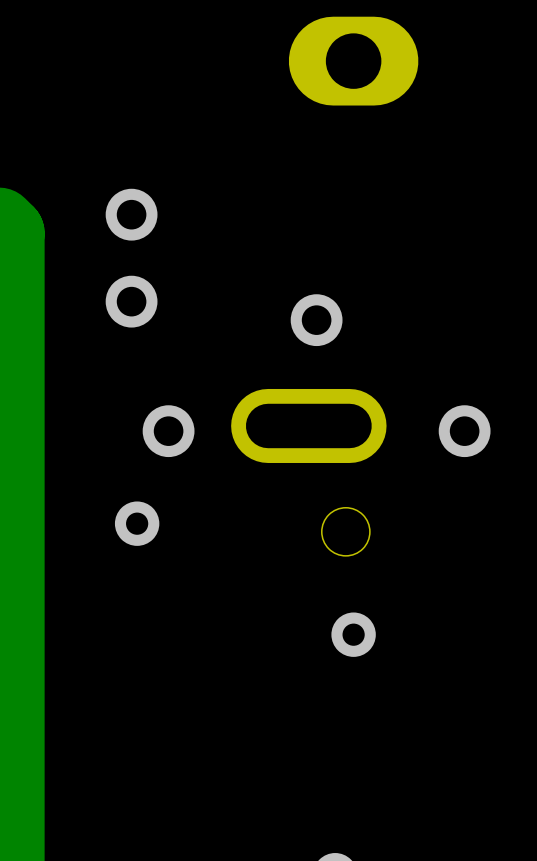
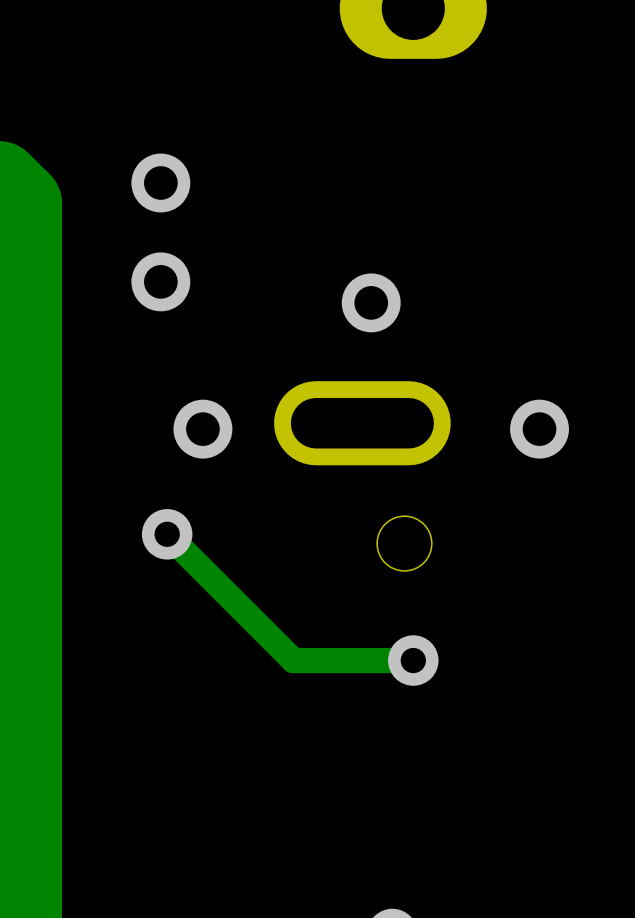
track: none -> (167, 534) (293, 660) (413, 660)

